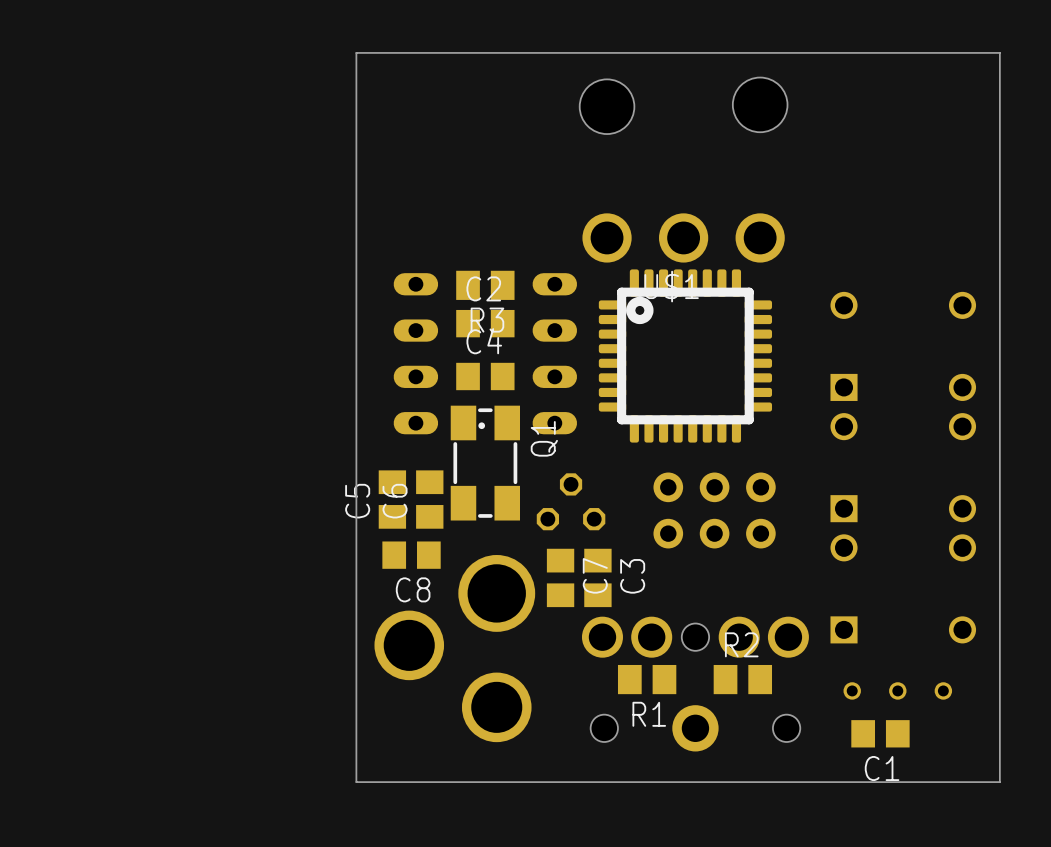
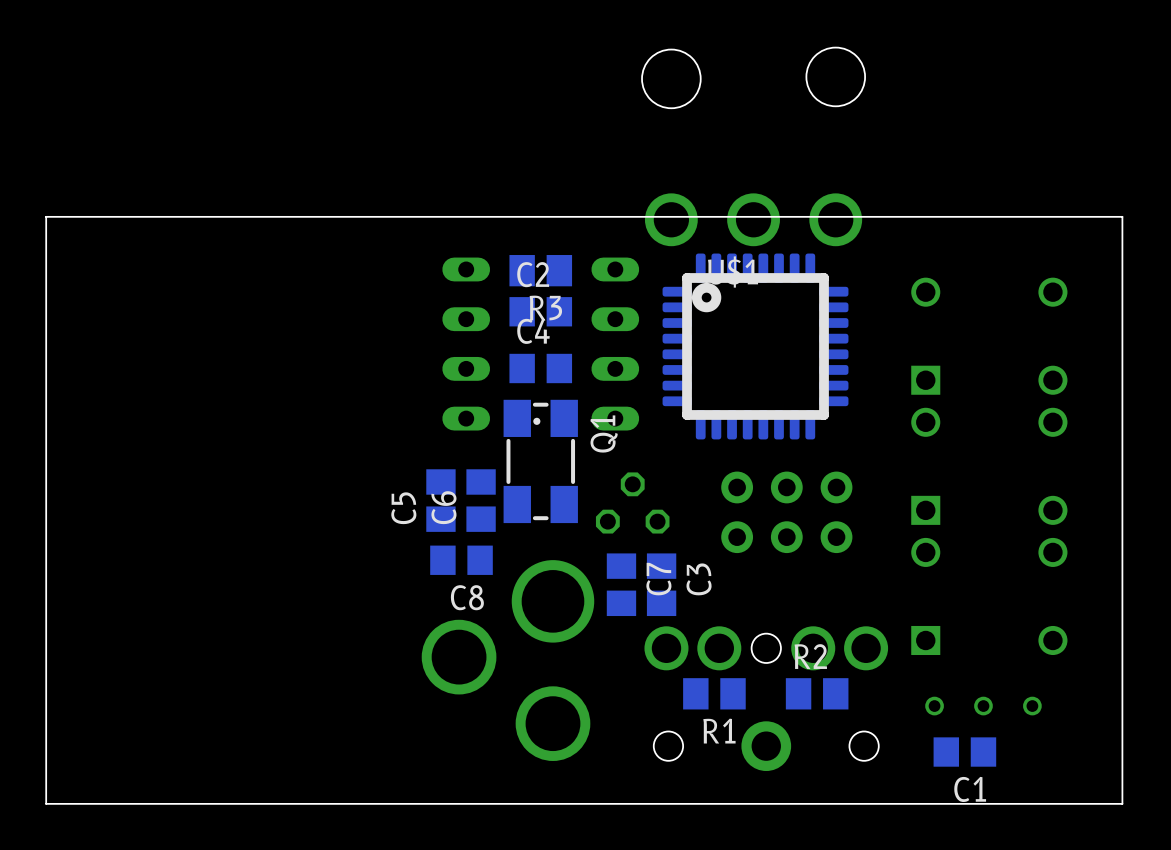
board edge: (999, 782) (999, 52) (356, 52) (356, 782) -> (1093, 803) (1122, 803) (1122, 216) (46, 216) (46, 803) (402, 803)

